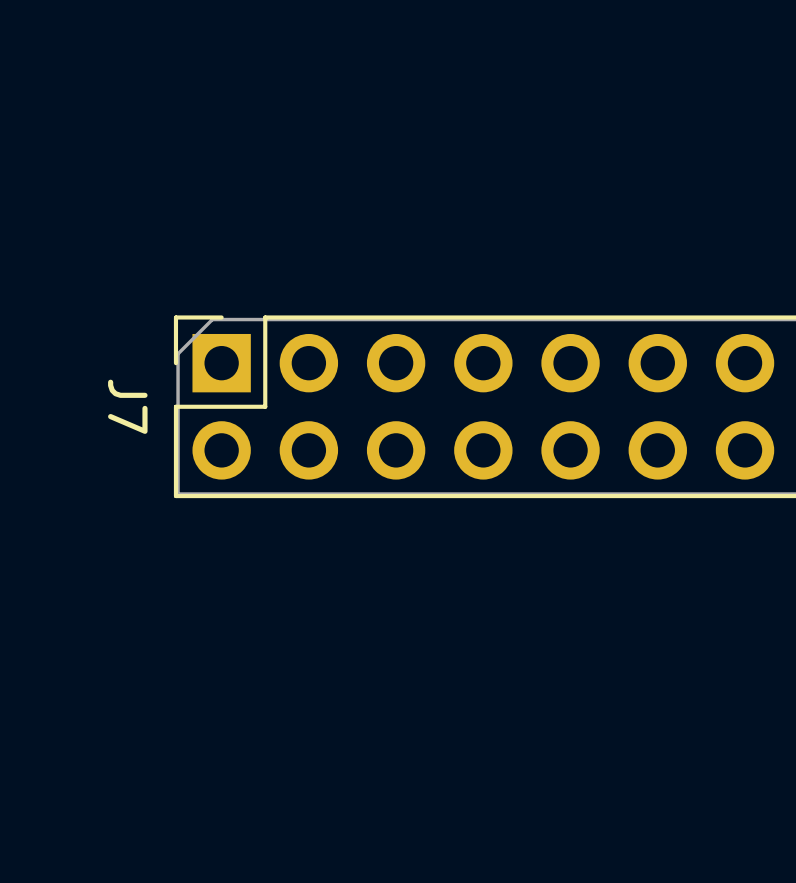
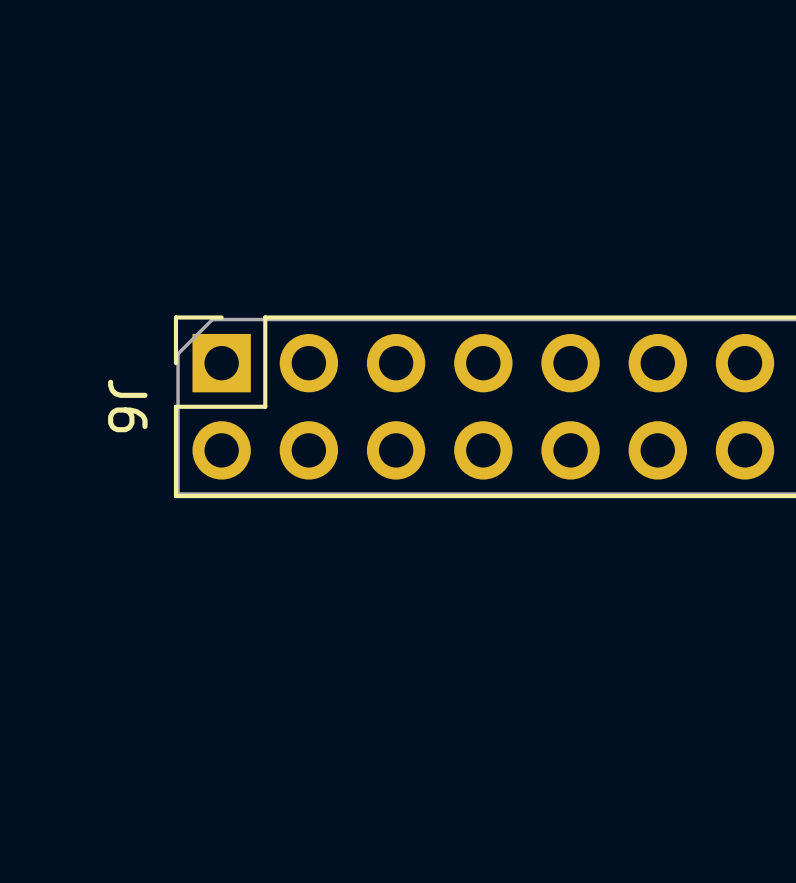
J7 name: J7 (127, 406) -> J6 (127, 405)

